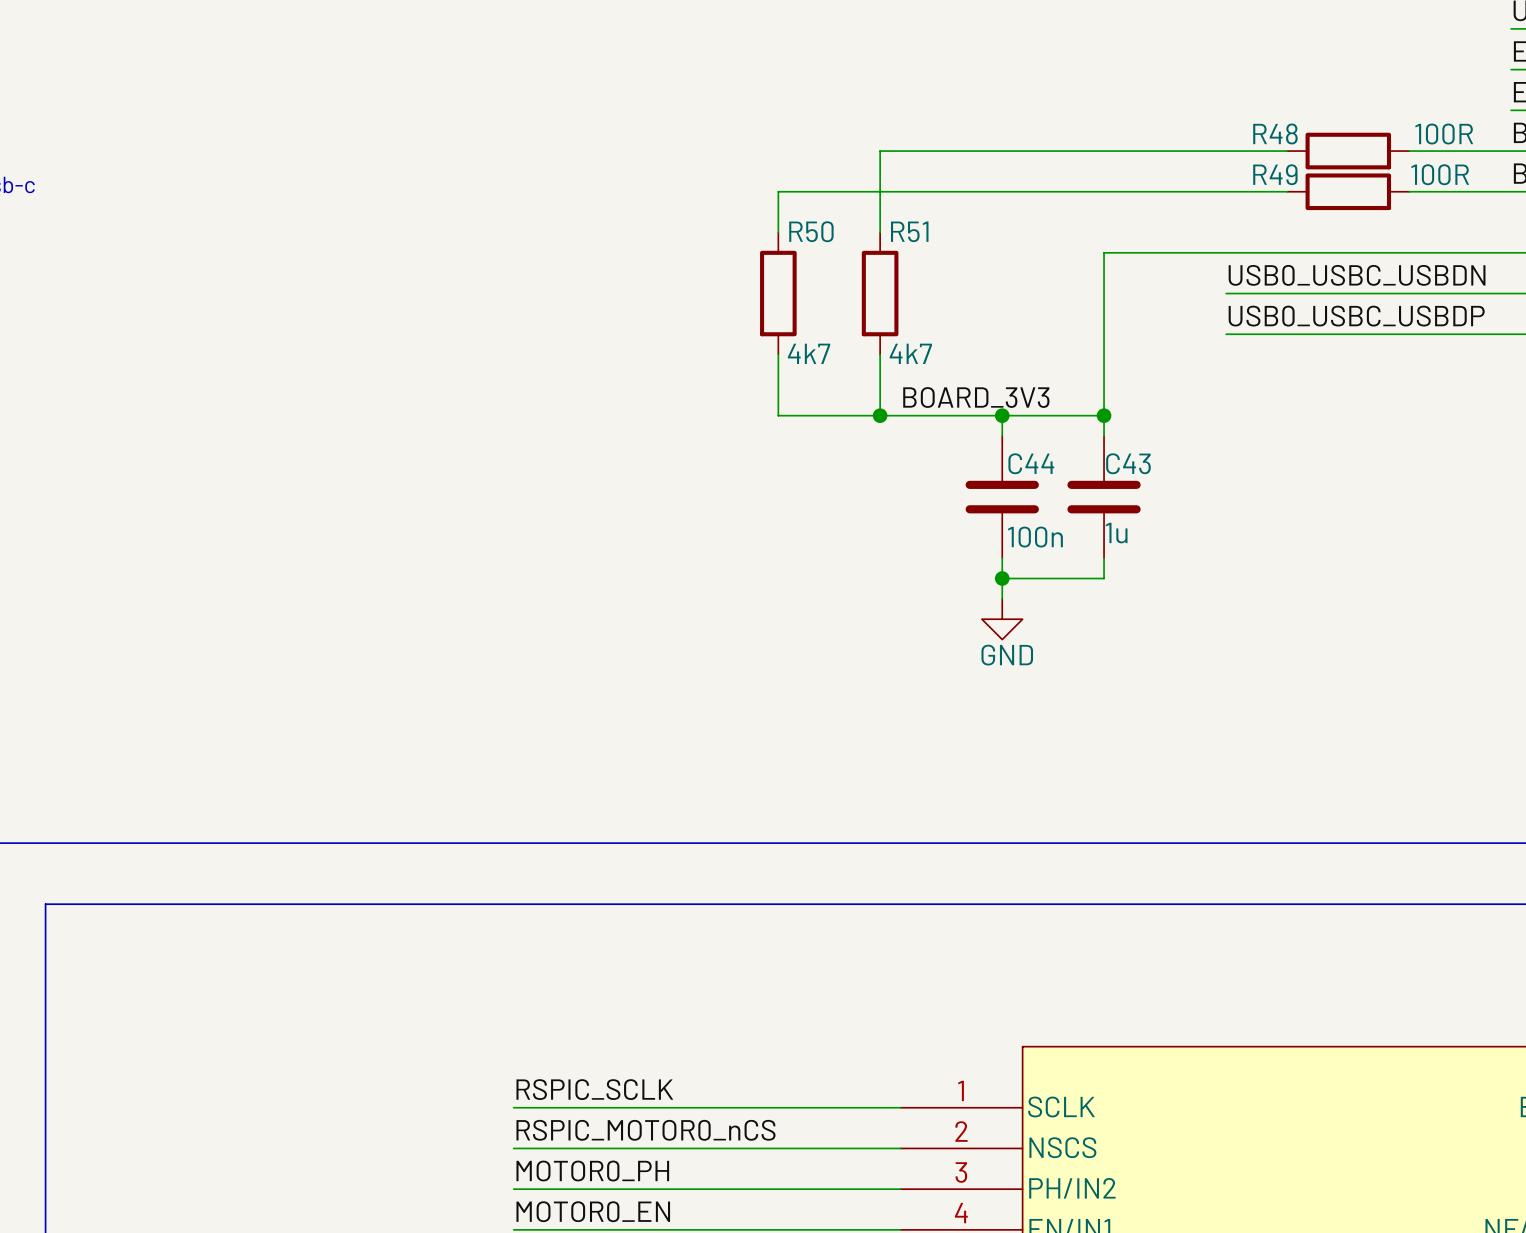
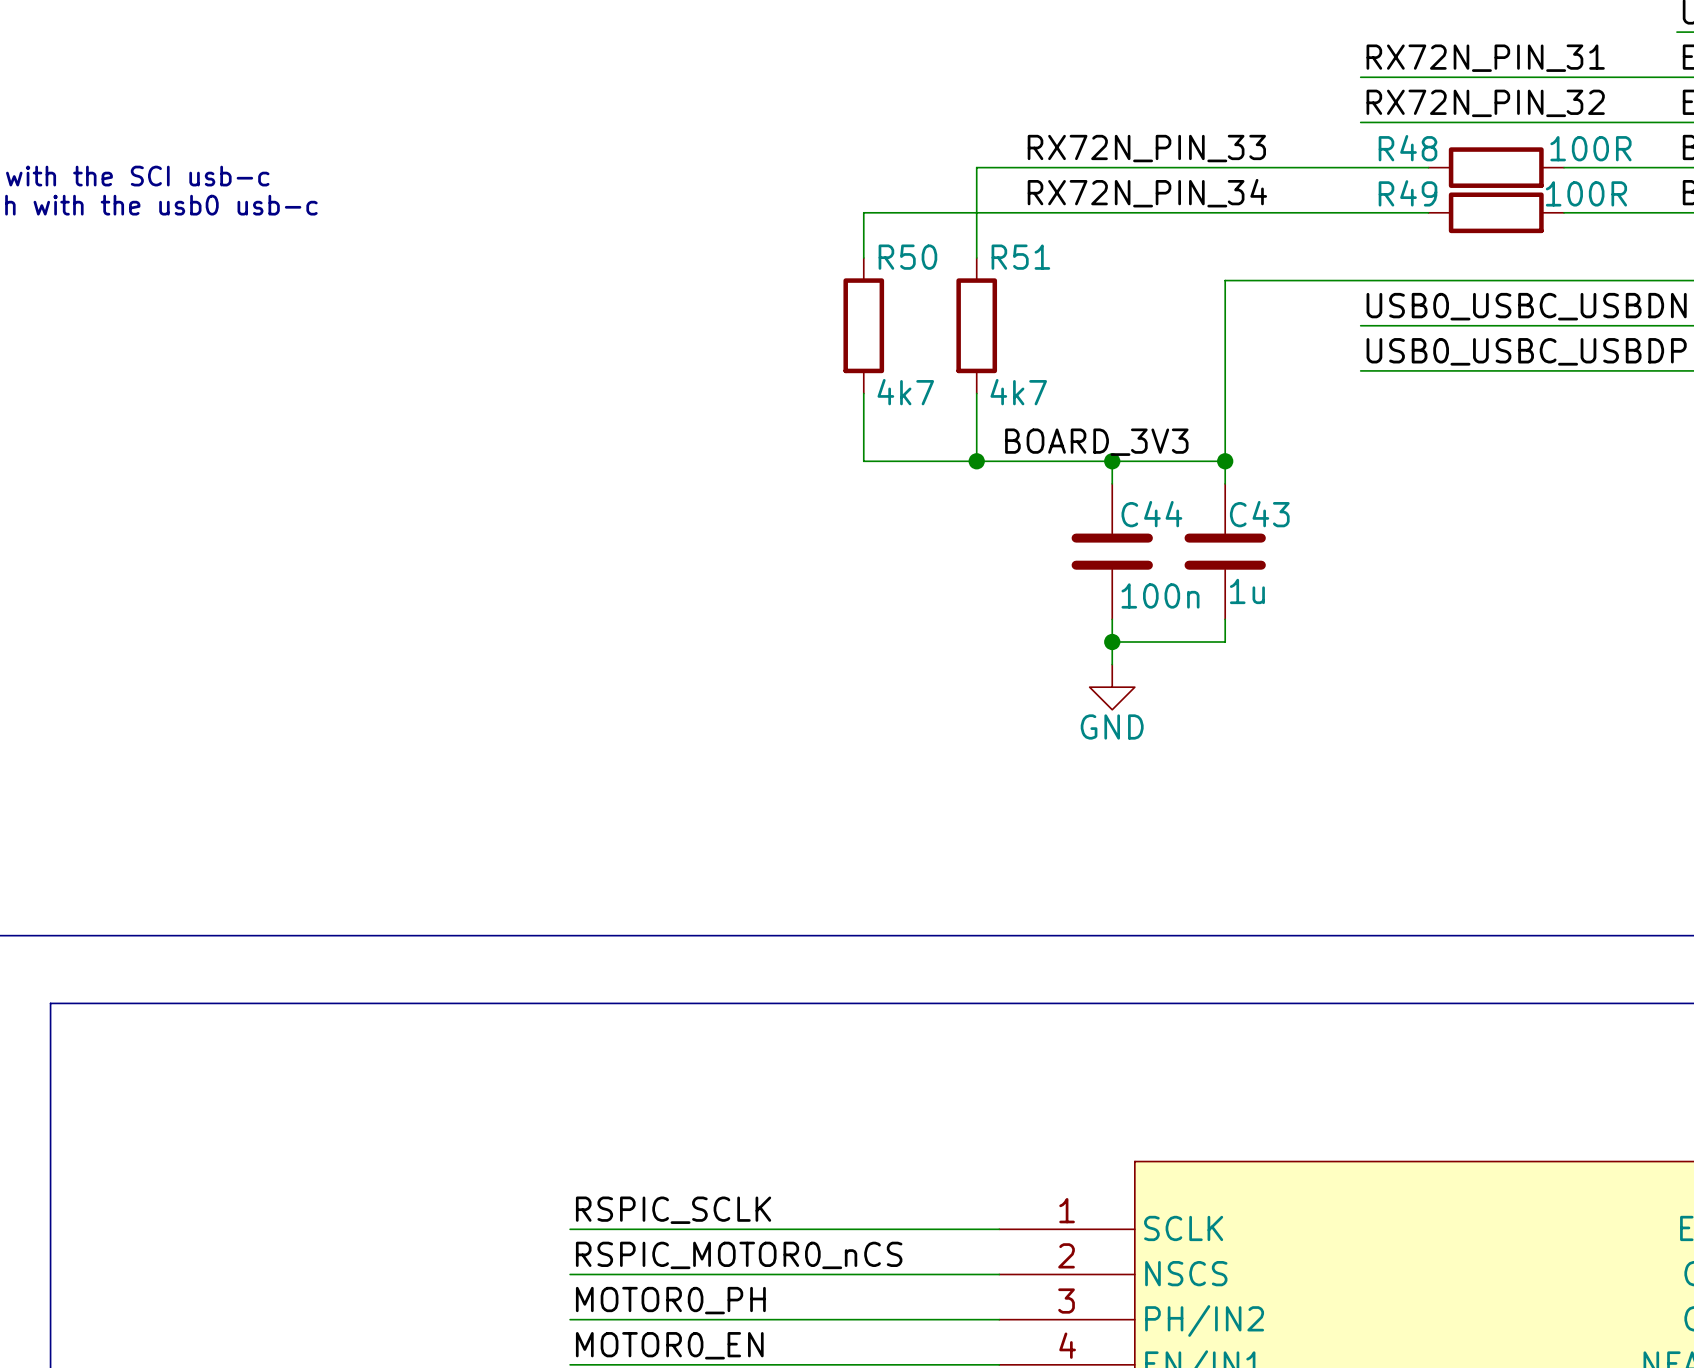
label: none -> RX72N_PIN_31 (1485, 58)
wire: none -> (1360, 77) (1676, 77)
label: none -> RX72N_PIN_32 (1485, 103)
wire: none -> (1360, 122) (1676, 122)
label: none -> RX72N_PIN_33 (1146, 148)
label: none -> RX72N_PIN_34 (1147, 193)

